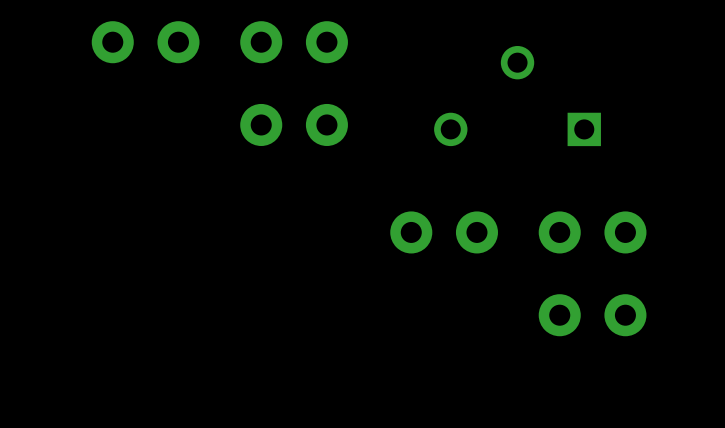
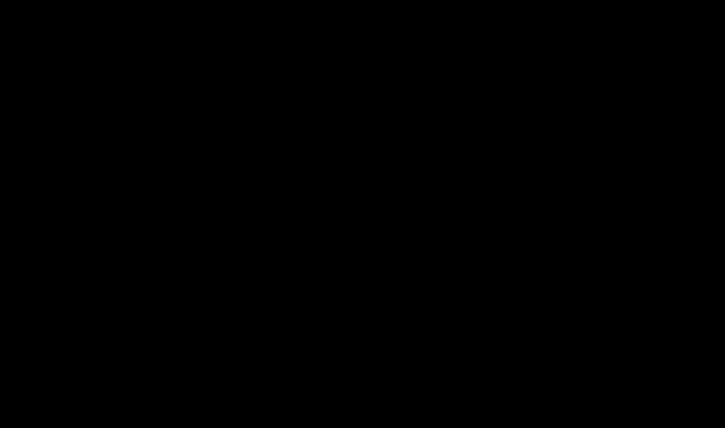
part: (145, 42) -> none
part: (294, 42) -> none
part: (517, 96) -> none
part: (294, 124) -> none
part: (444, 232) -> none
part: (592, 232) -> none
part: (592, 315) -> none

